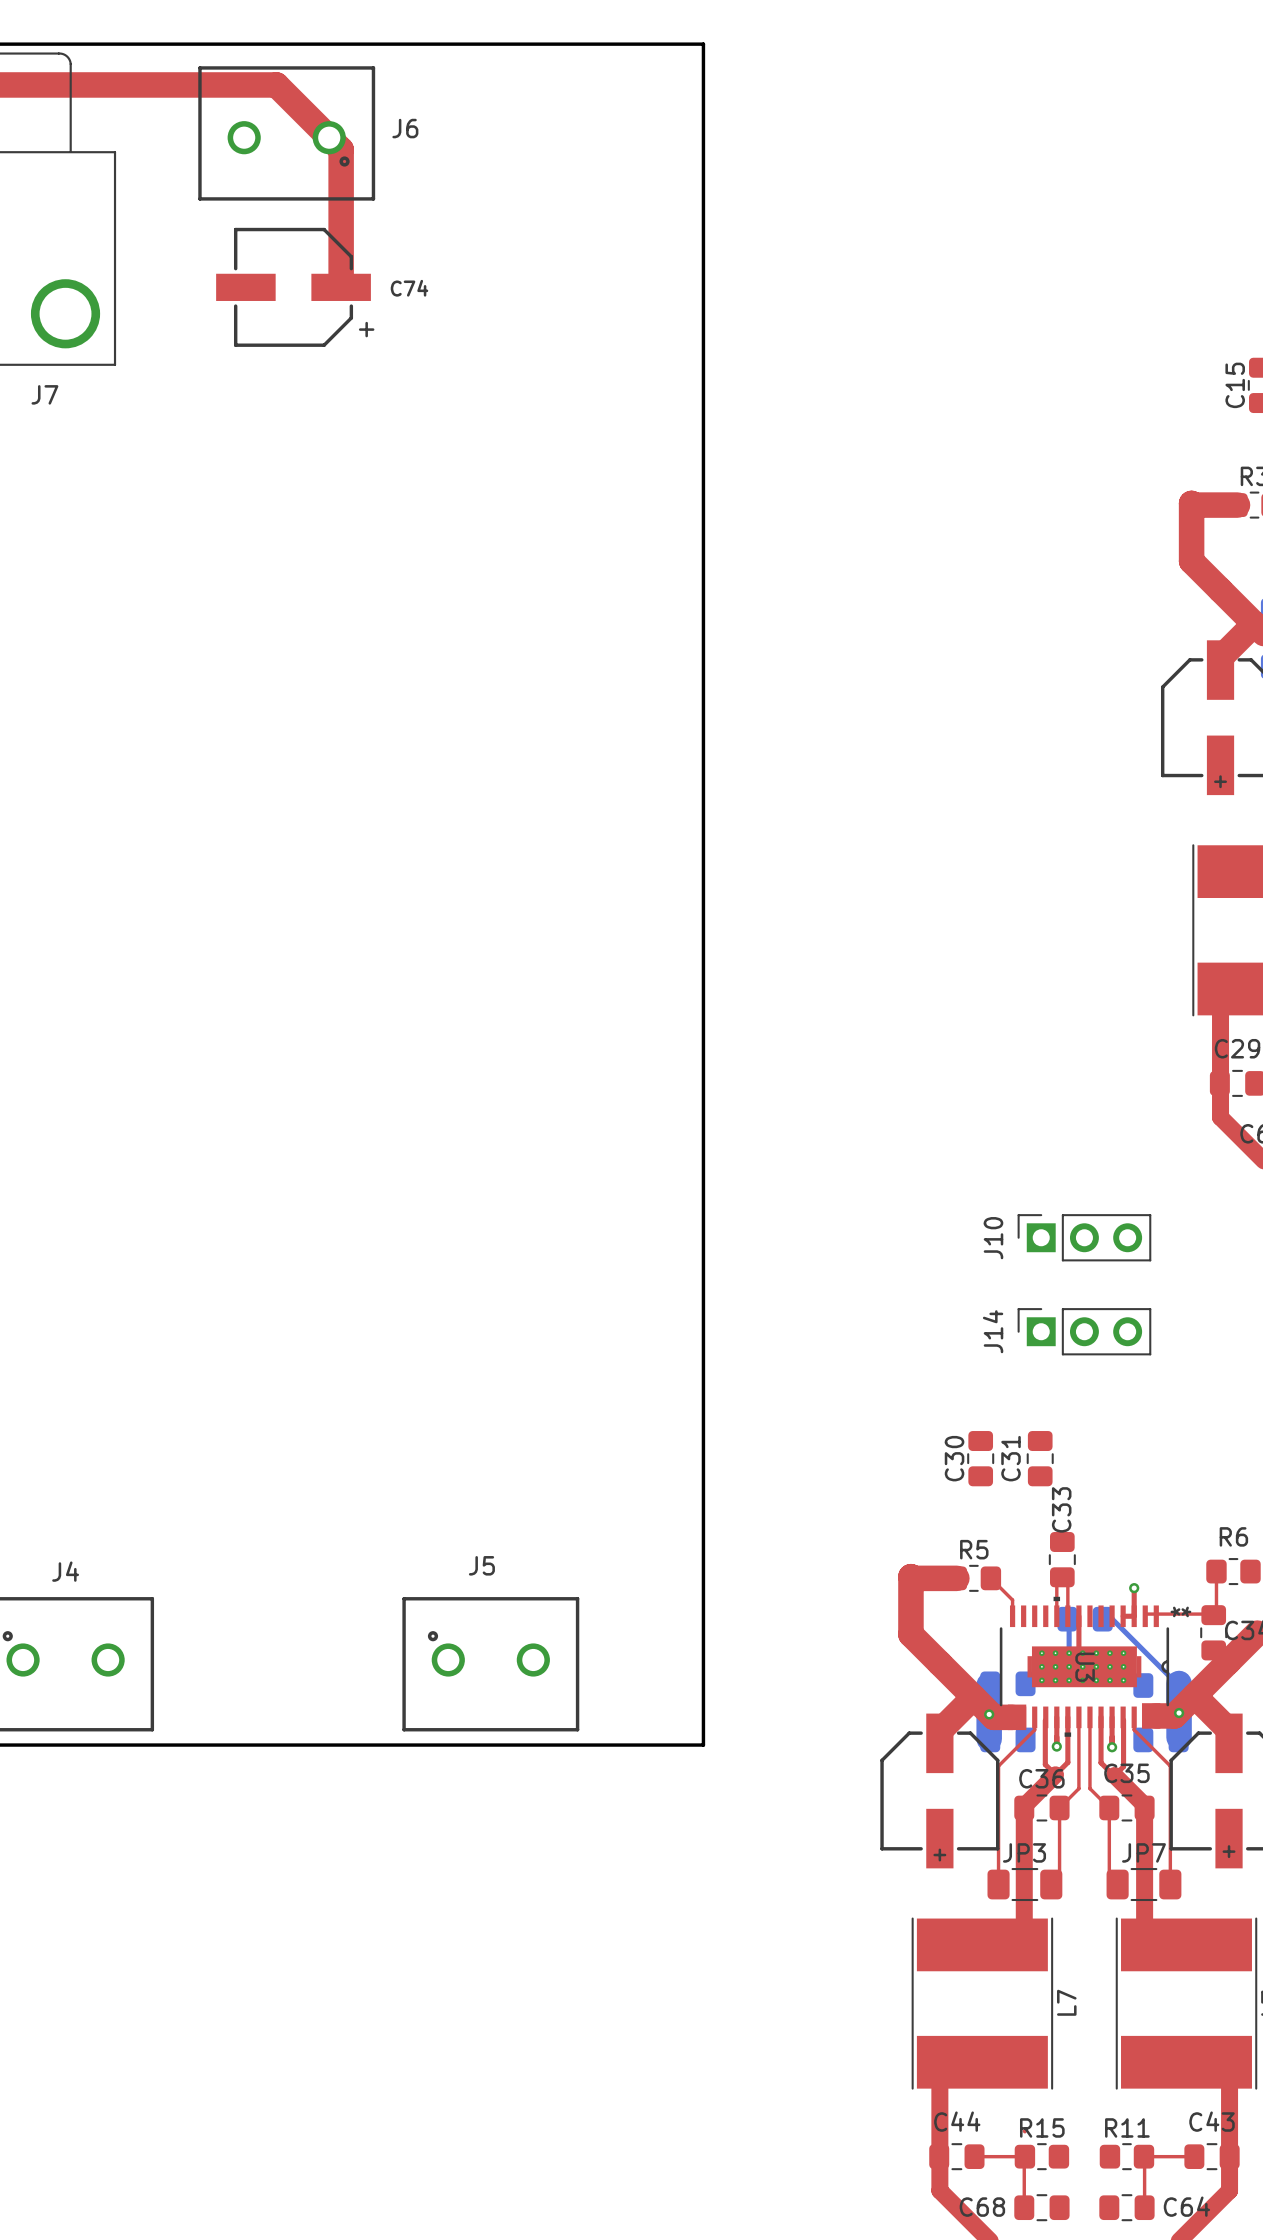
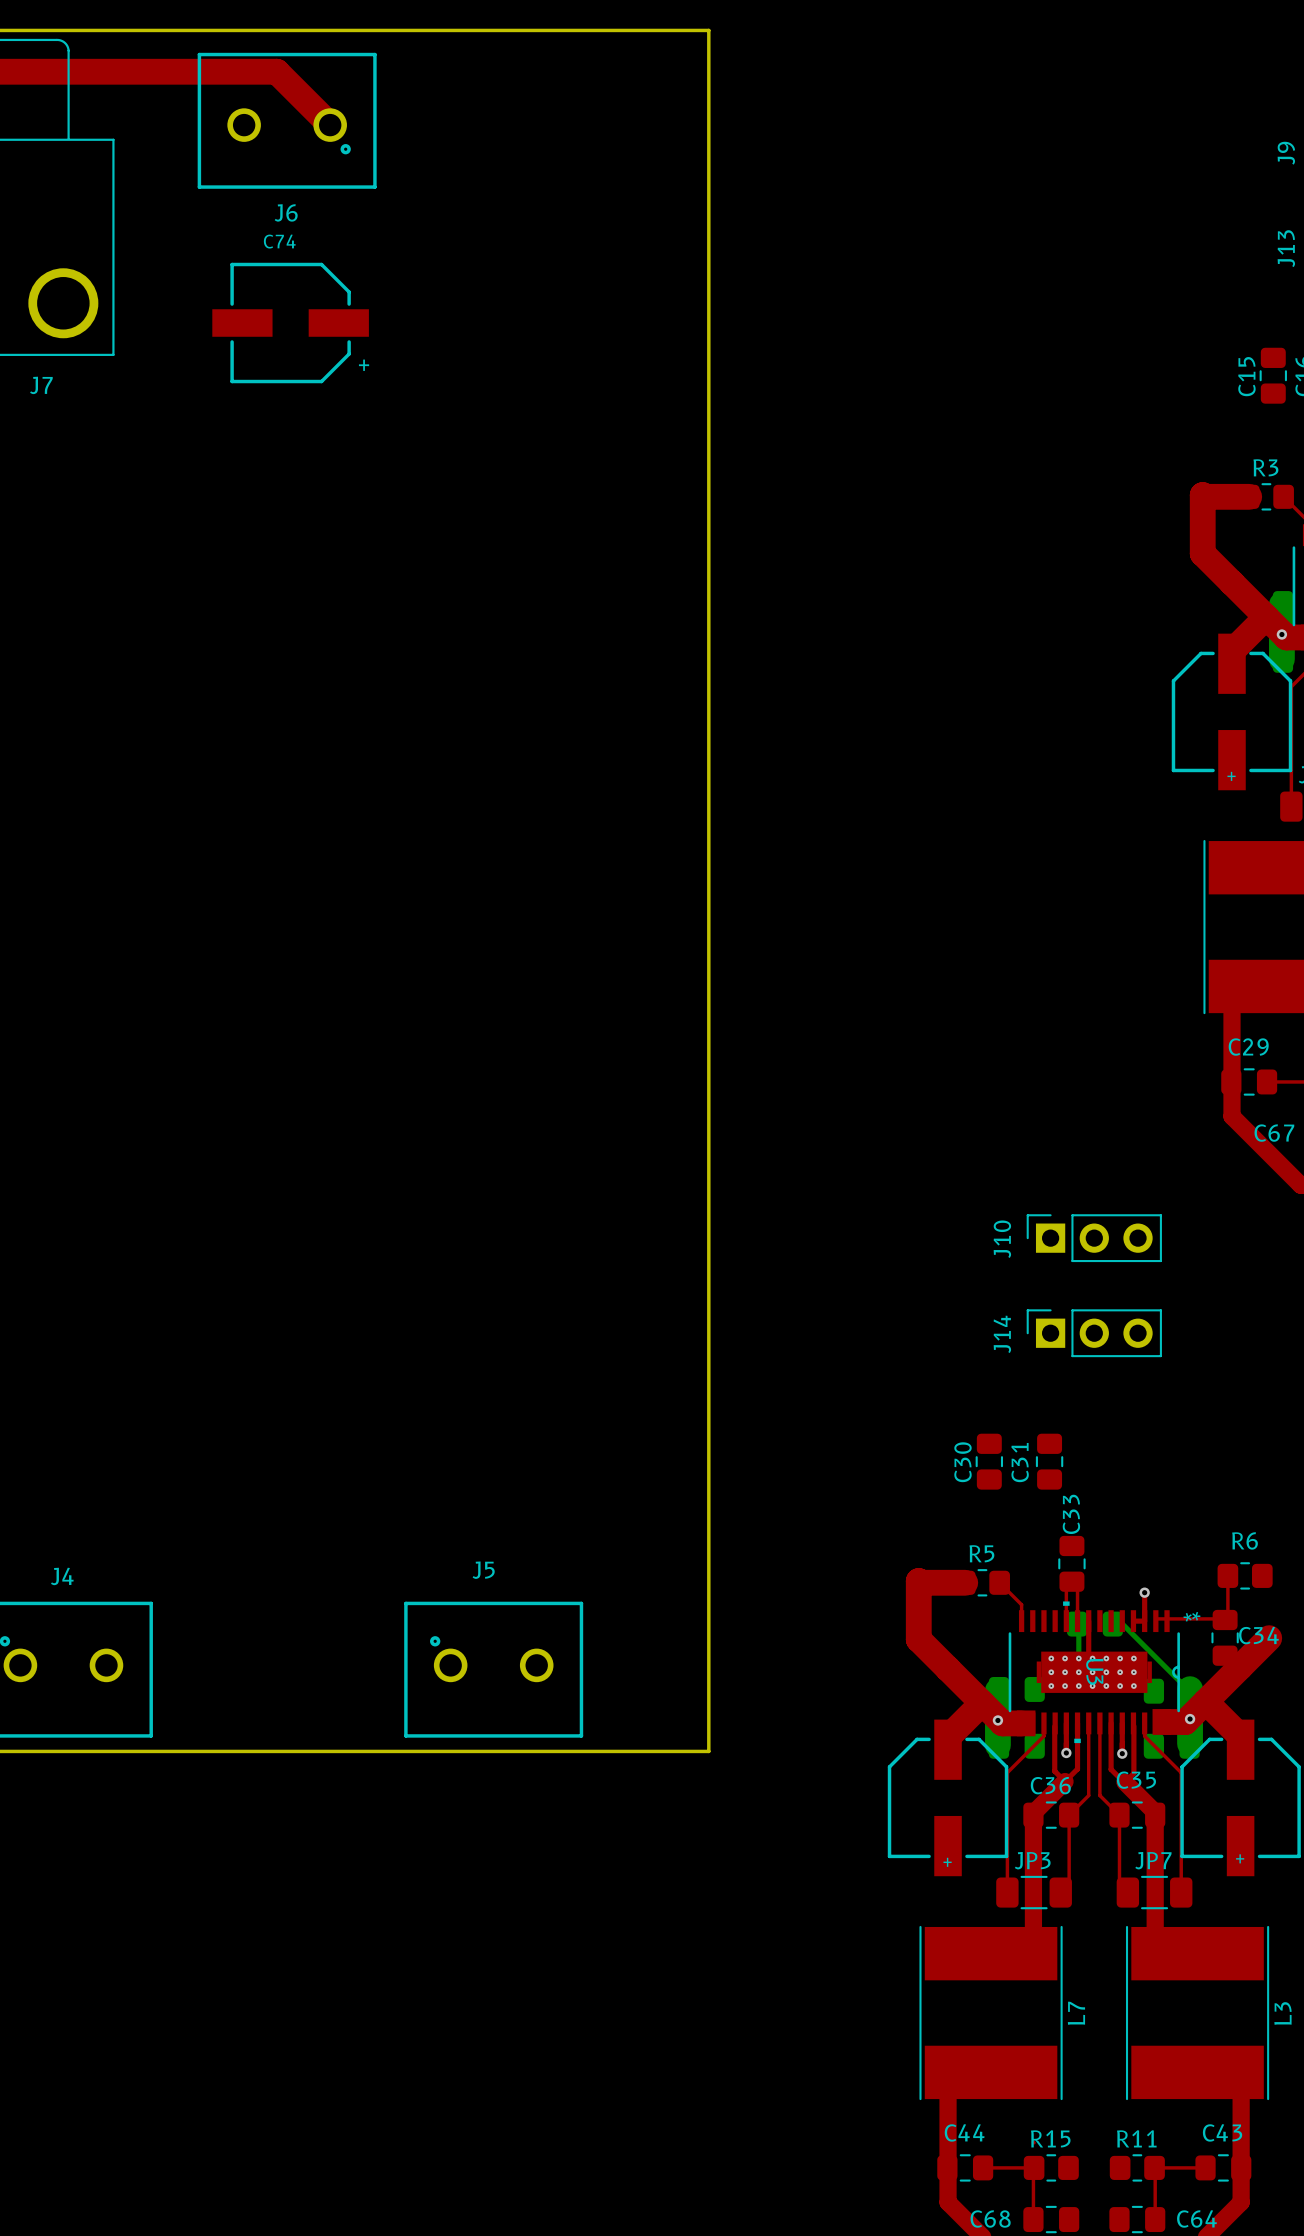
J6 name position: J6 (405, 128) -> J6 (286, 212)
top track: (329, 137) (341, 149) (341, 287) -> none
C74 position: (293, 287) -> (290, 323)
C74 name position: C74 (409, 288) -> C74 (279, 241)

